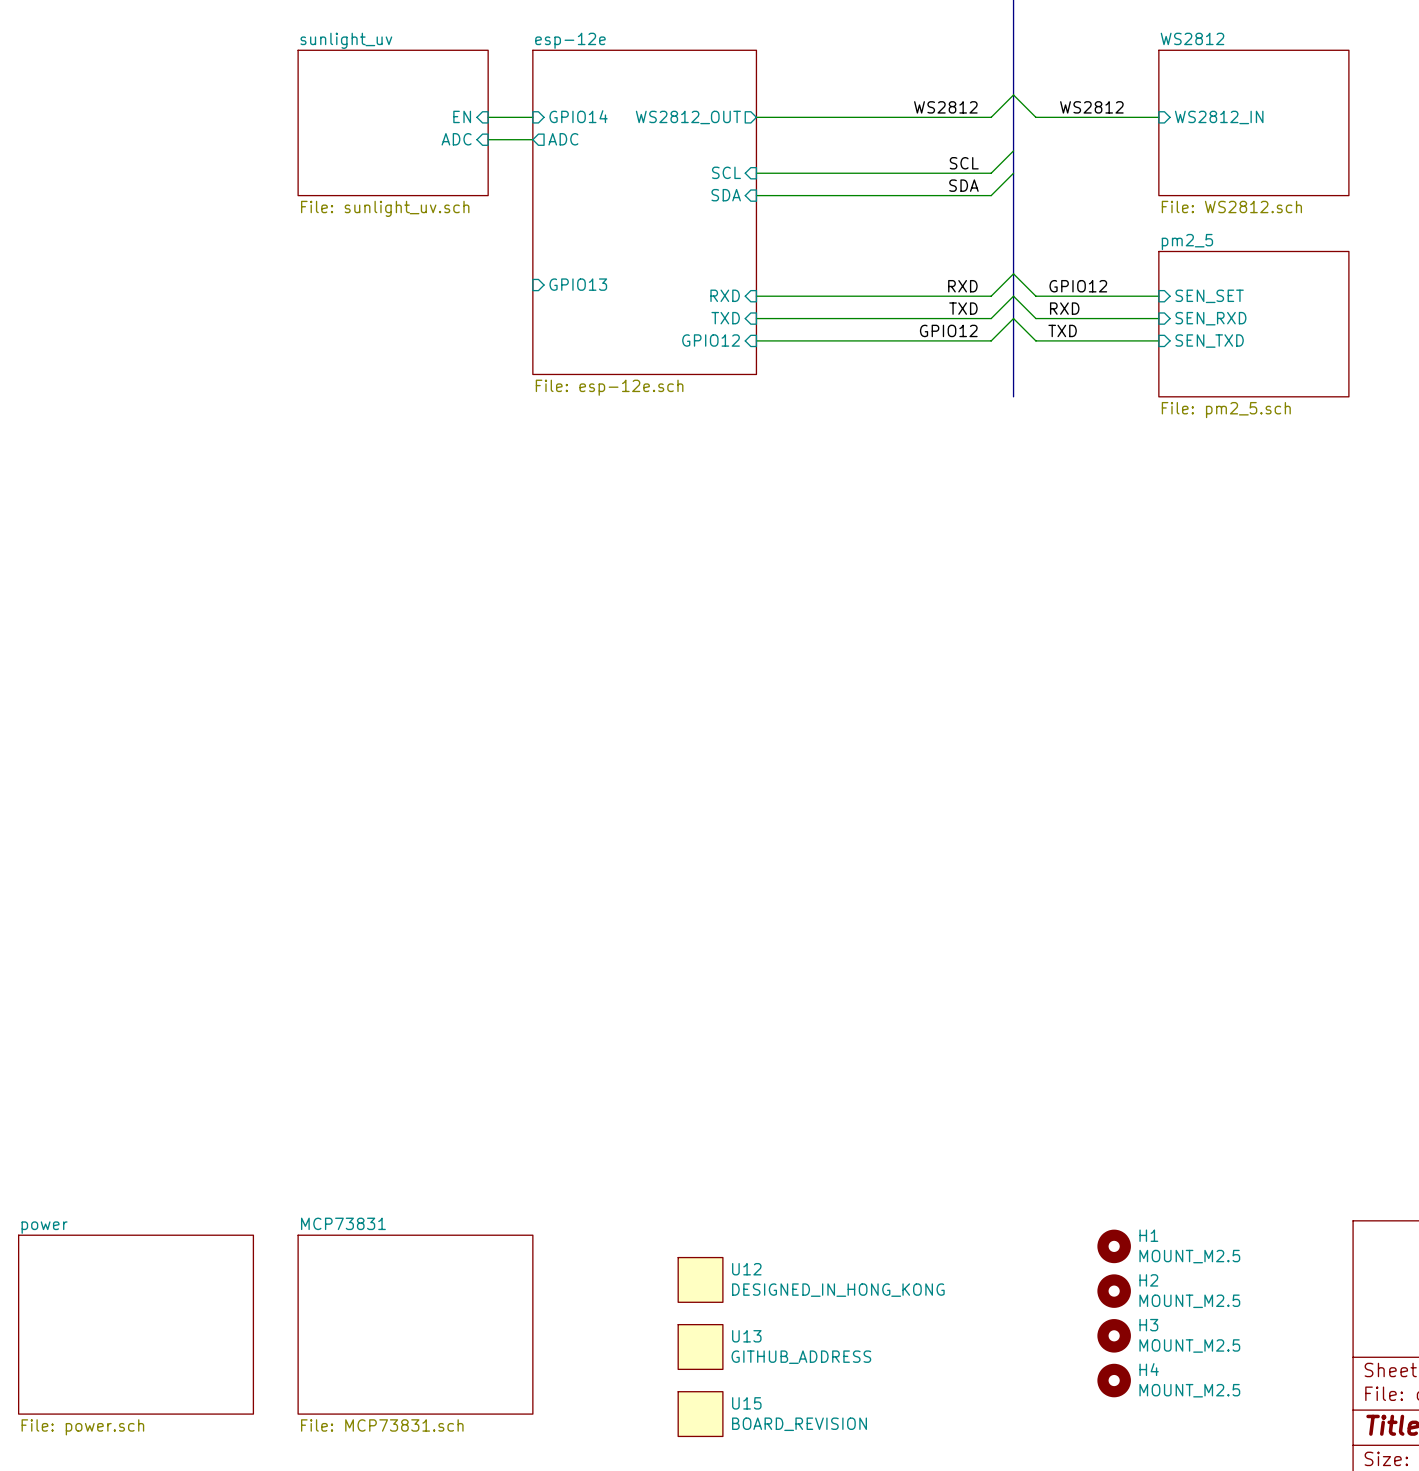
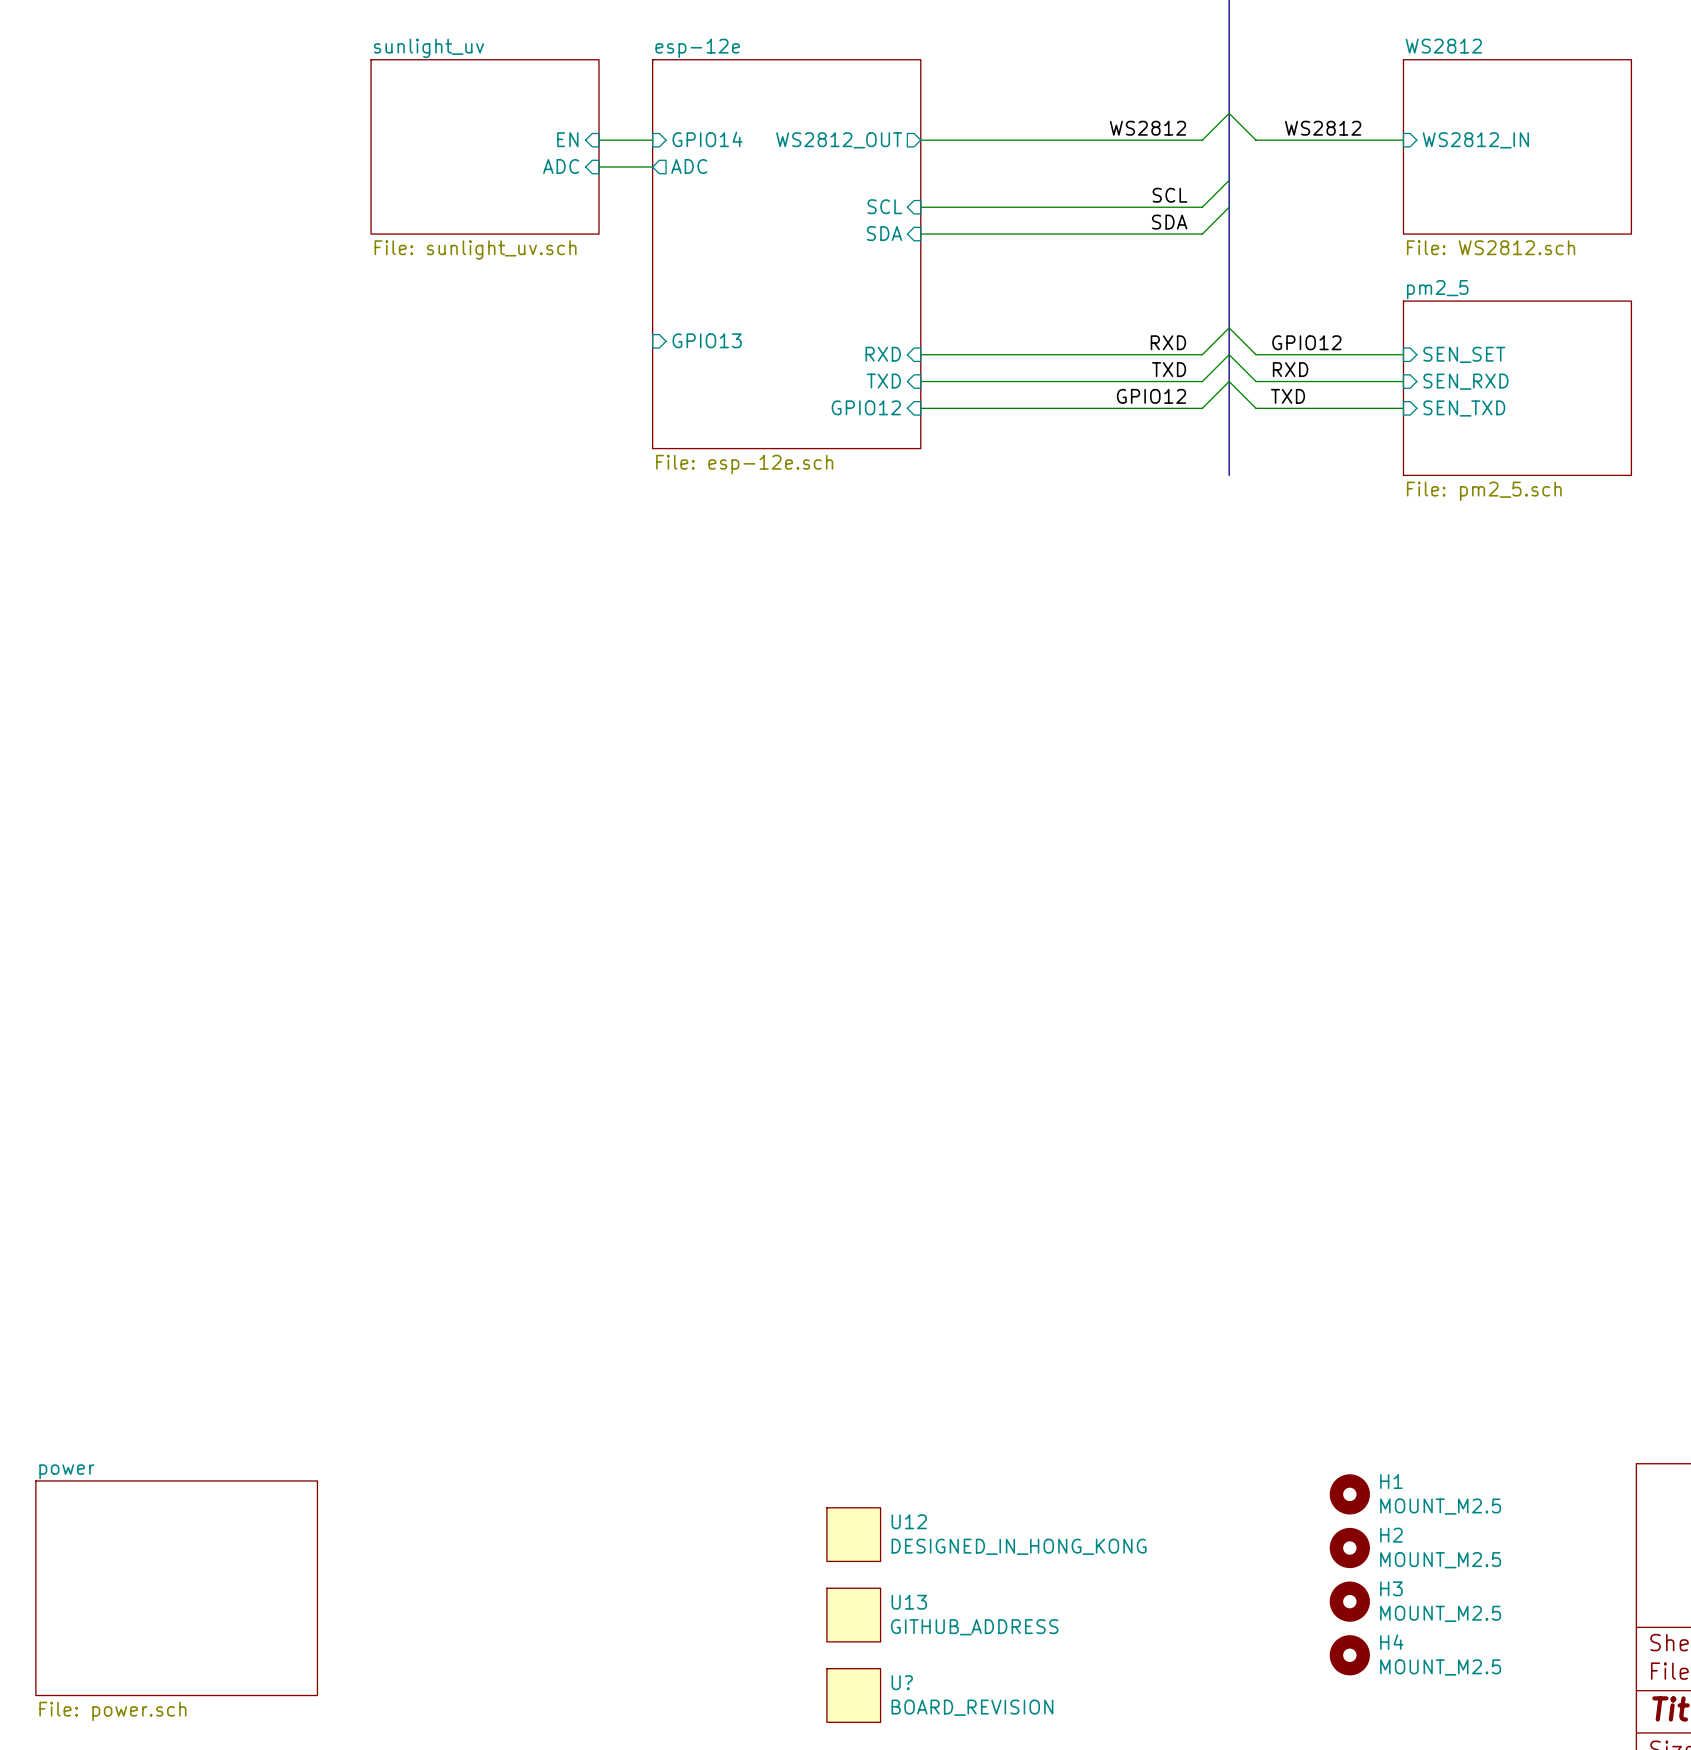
sheet MCP73831: File: MCP73831.sch (415, 1324) -> none
U15 name: U15 (746, 1403) -> U? (902, 1682)

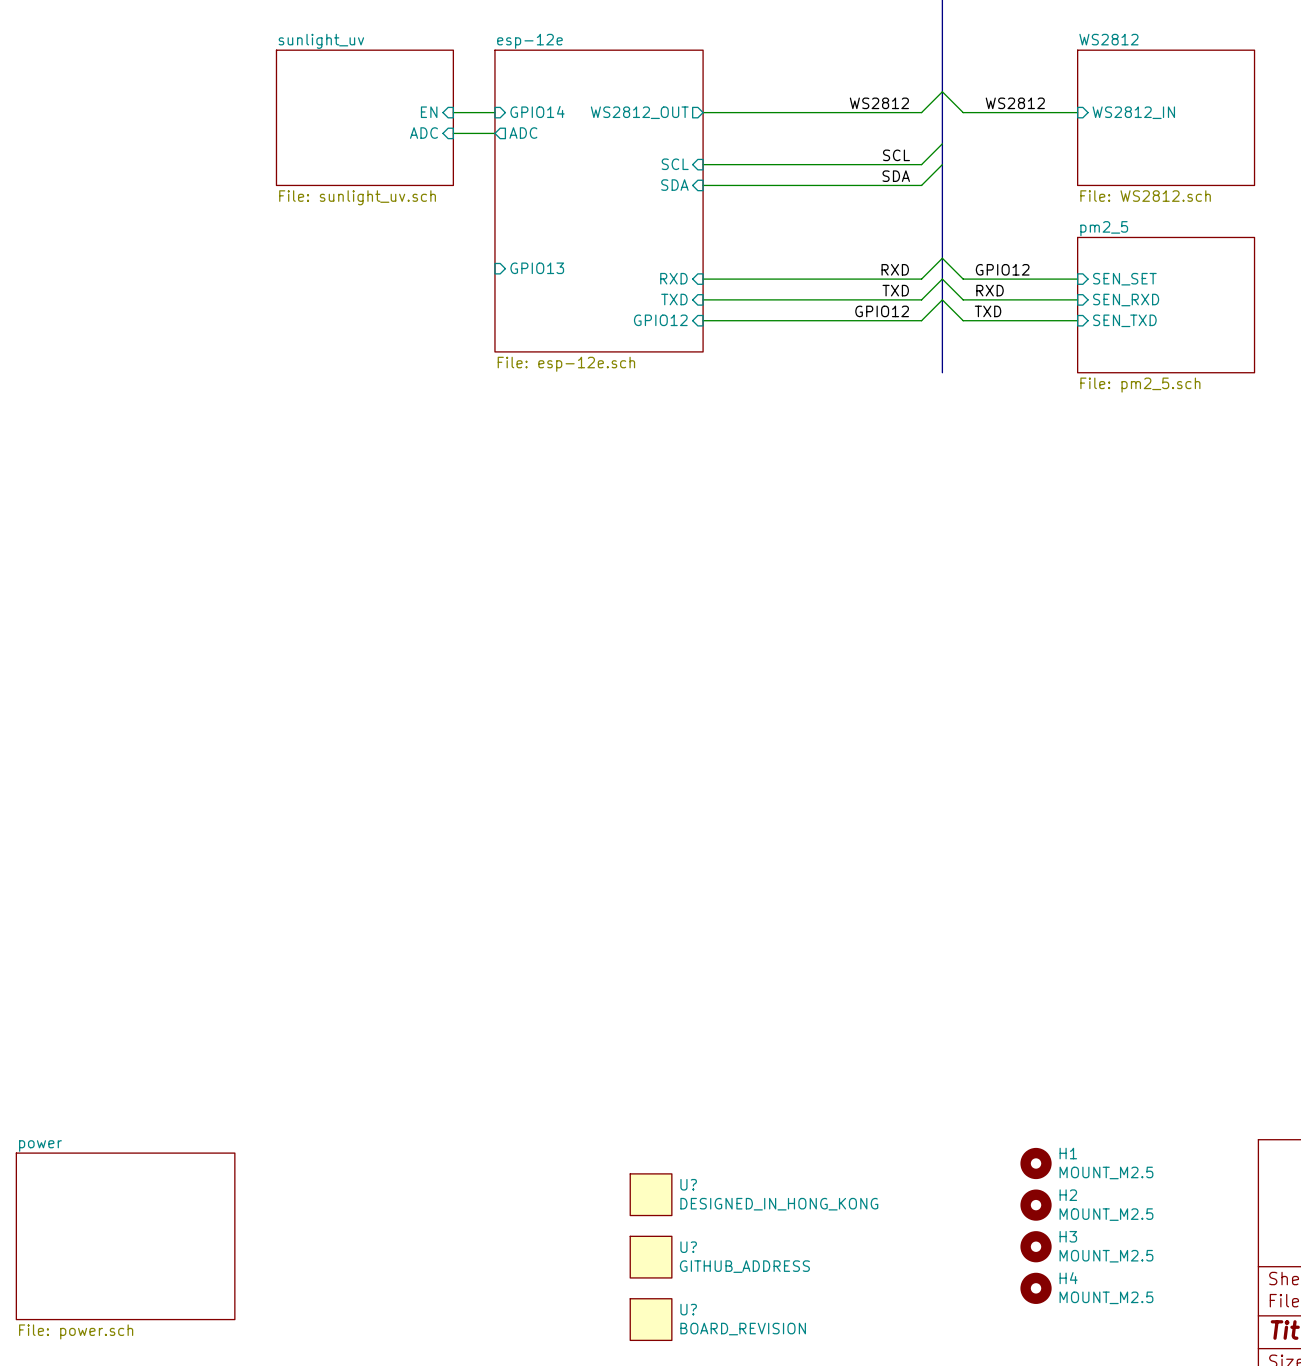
U12 name: U12 (909, 1521) -> U? (688, 1184)
U13 name: U13 (909, 1602) -> U? (688, 1247)

